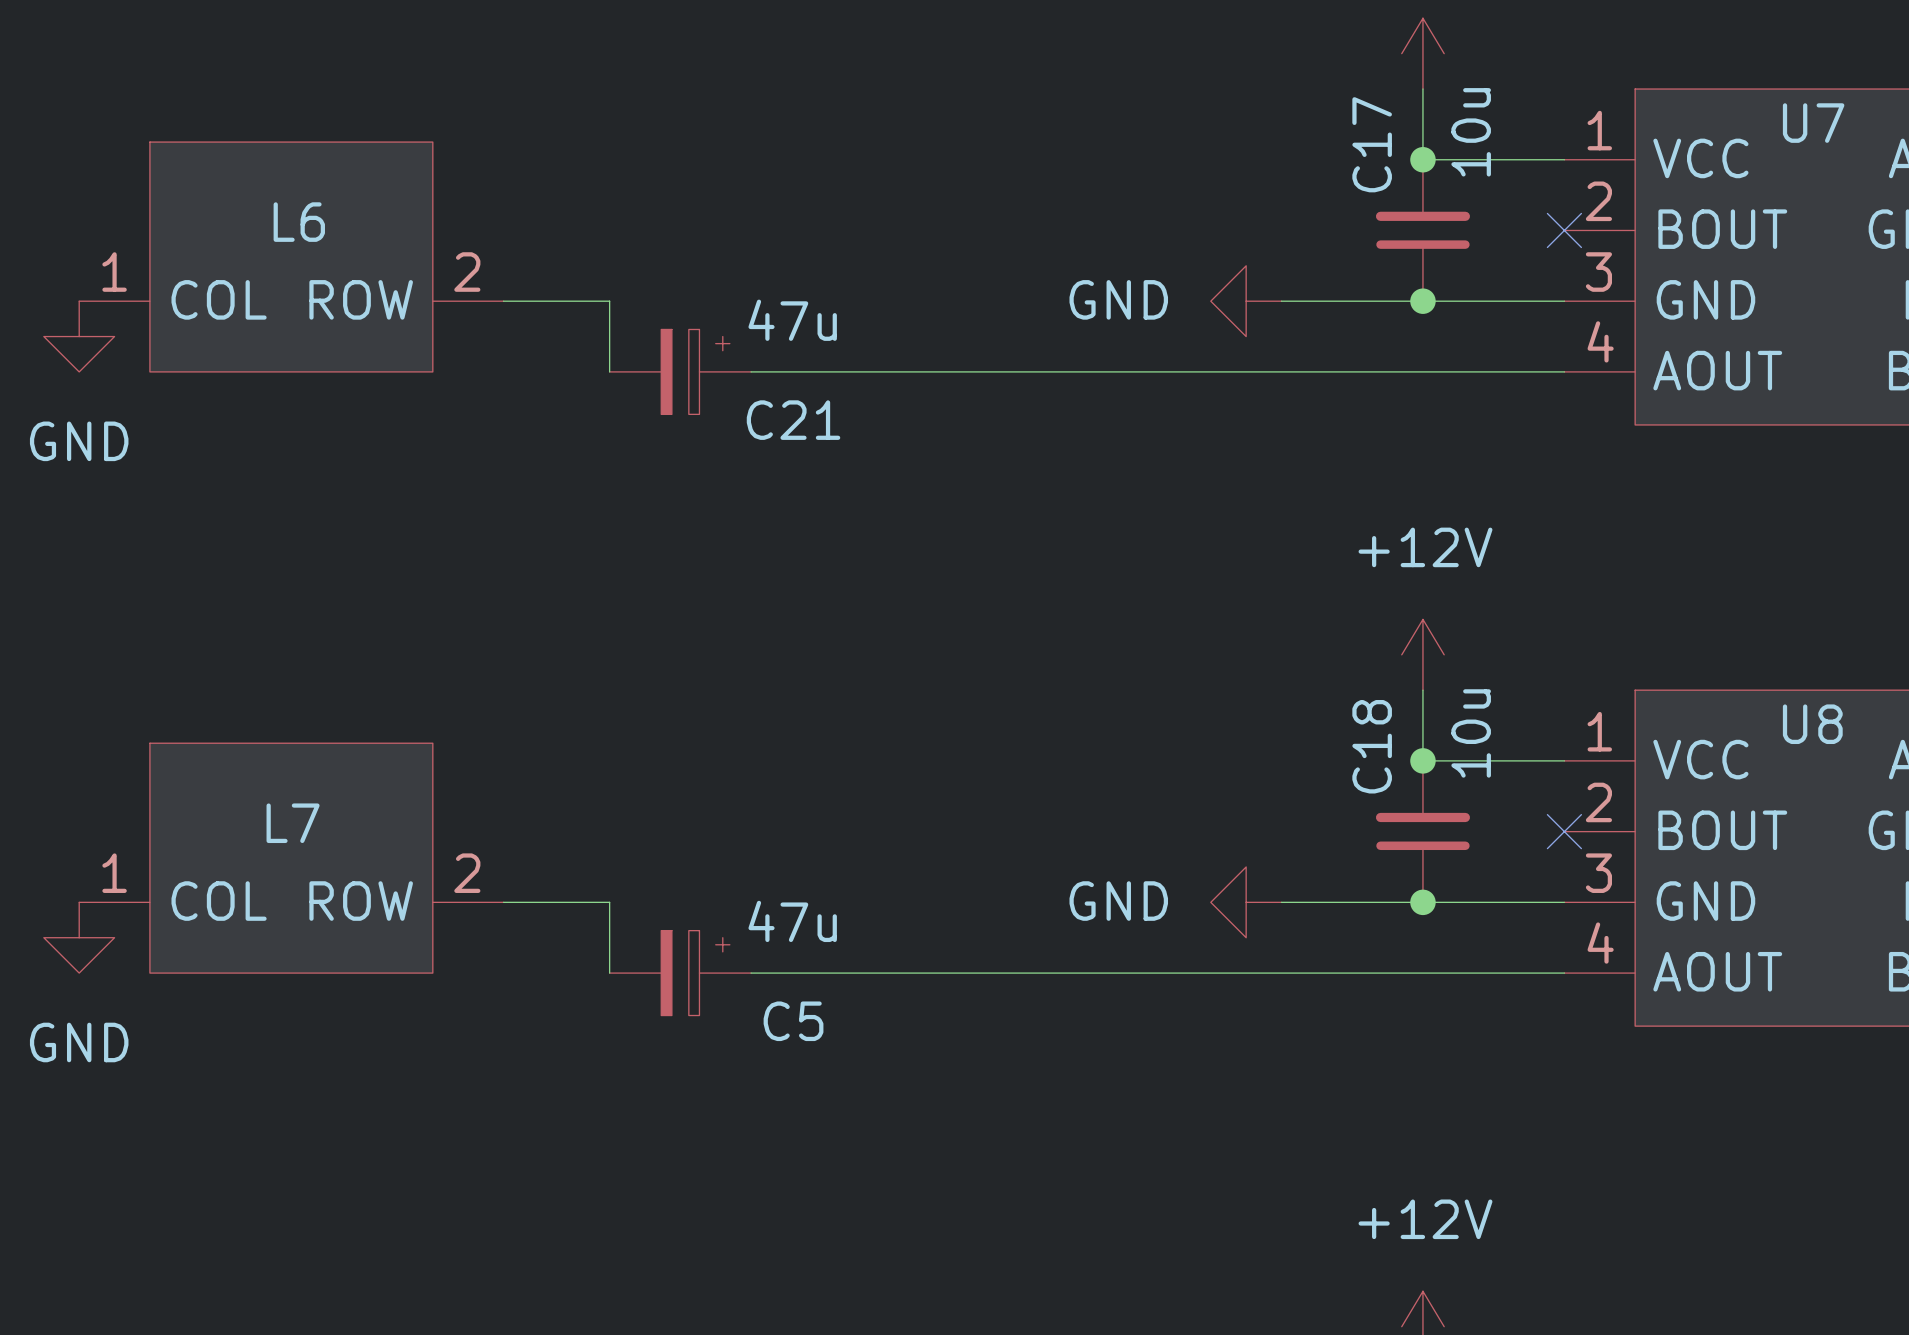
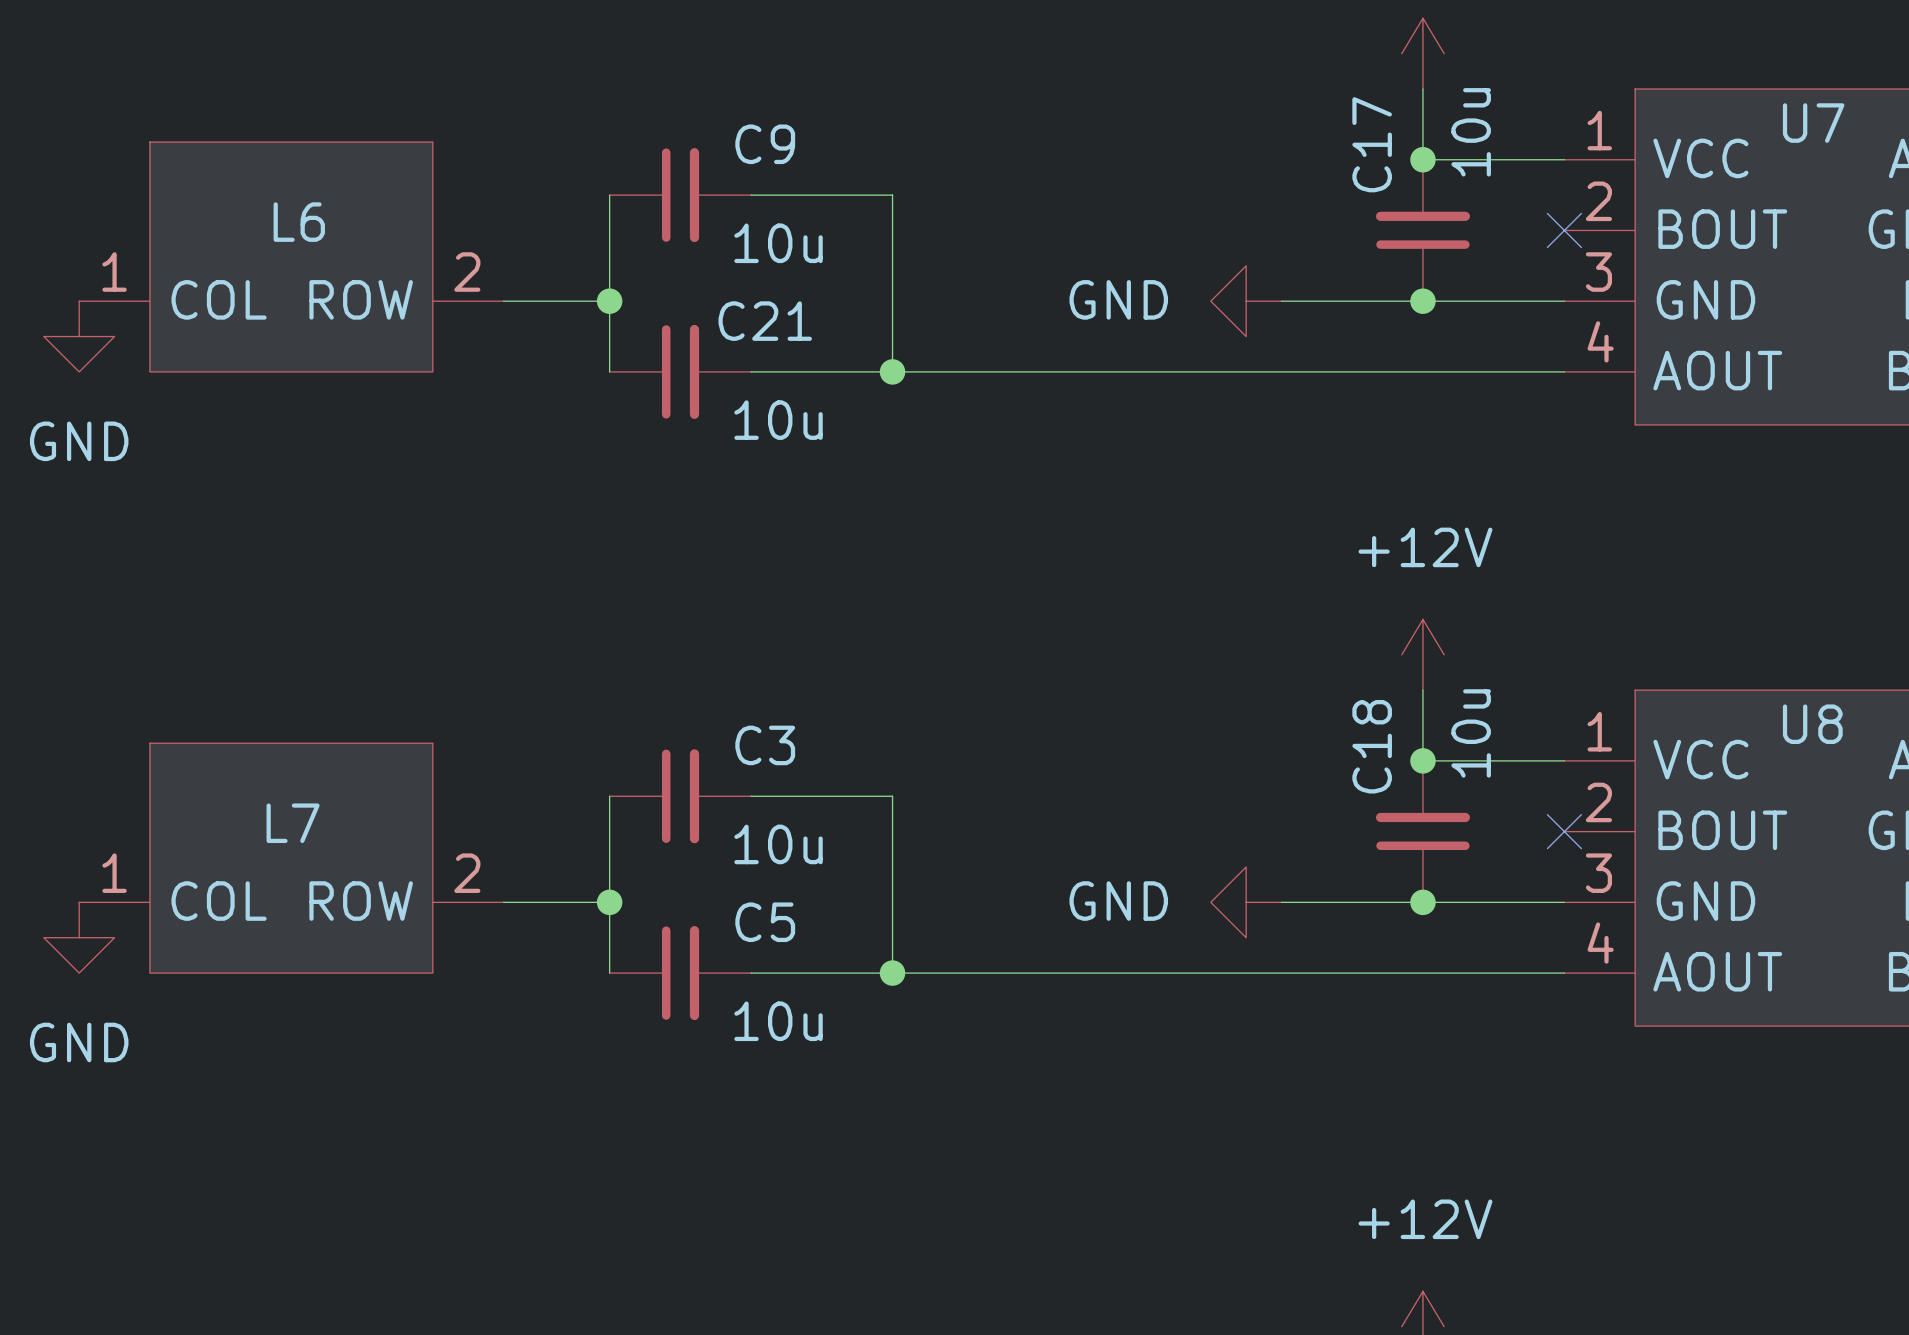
wire: none -> (609, 195) (609, 301)
C9: none -> 10u (680, 195)
wire: none -> (751, 195) (892, 195) (892, 371)
junction: none -> (609, 301)
C21 value: 47u (792, 320) -> 10u (778, 420)
C21 symbol: [609, 329, 752, 415] -> [609, 324, 752, 419]
junction: none -> (892, 371)
C21 name position: C21 (793, 420) -> C21 (765, 321)
wire: none -> (609, 796) (609, 902)
C3: none -> 10u (680, 796)
wire: none -> (751, 796) (892, 796) (892, 973)
junction: none -> (609, 902)
C5 value: 47u (792, 921) -> 10u (778, 1021)
C5 symbol: [609, 930, 752, 1016] -> [609, 926, 752, 1021]
junction: none -> (892, 973)
C5 name position: C5 (793, 1021) -> C5 (765, 922)

